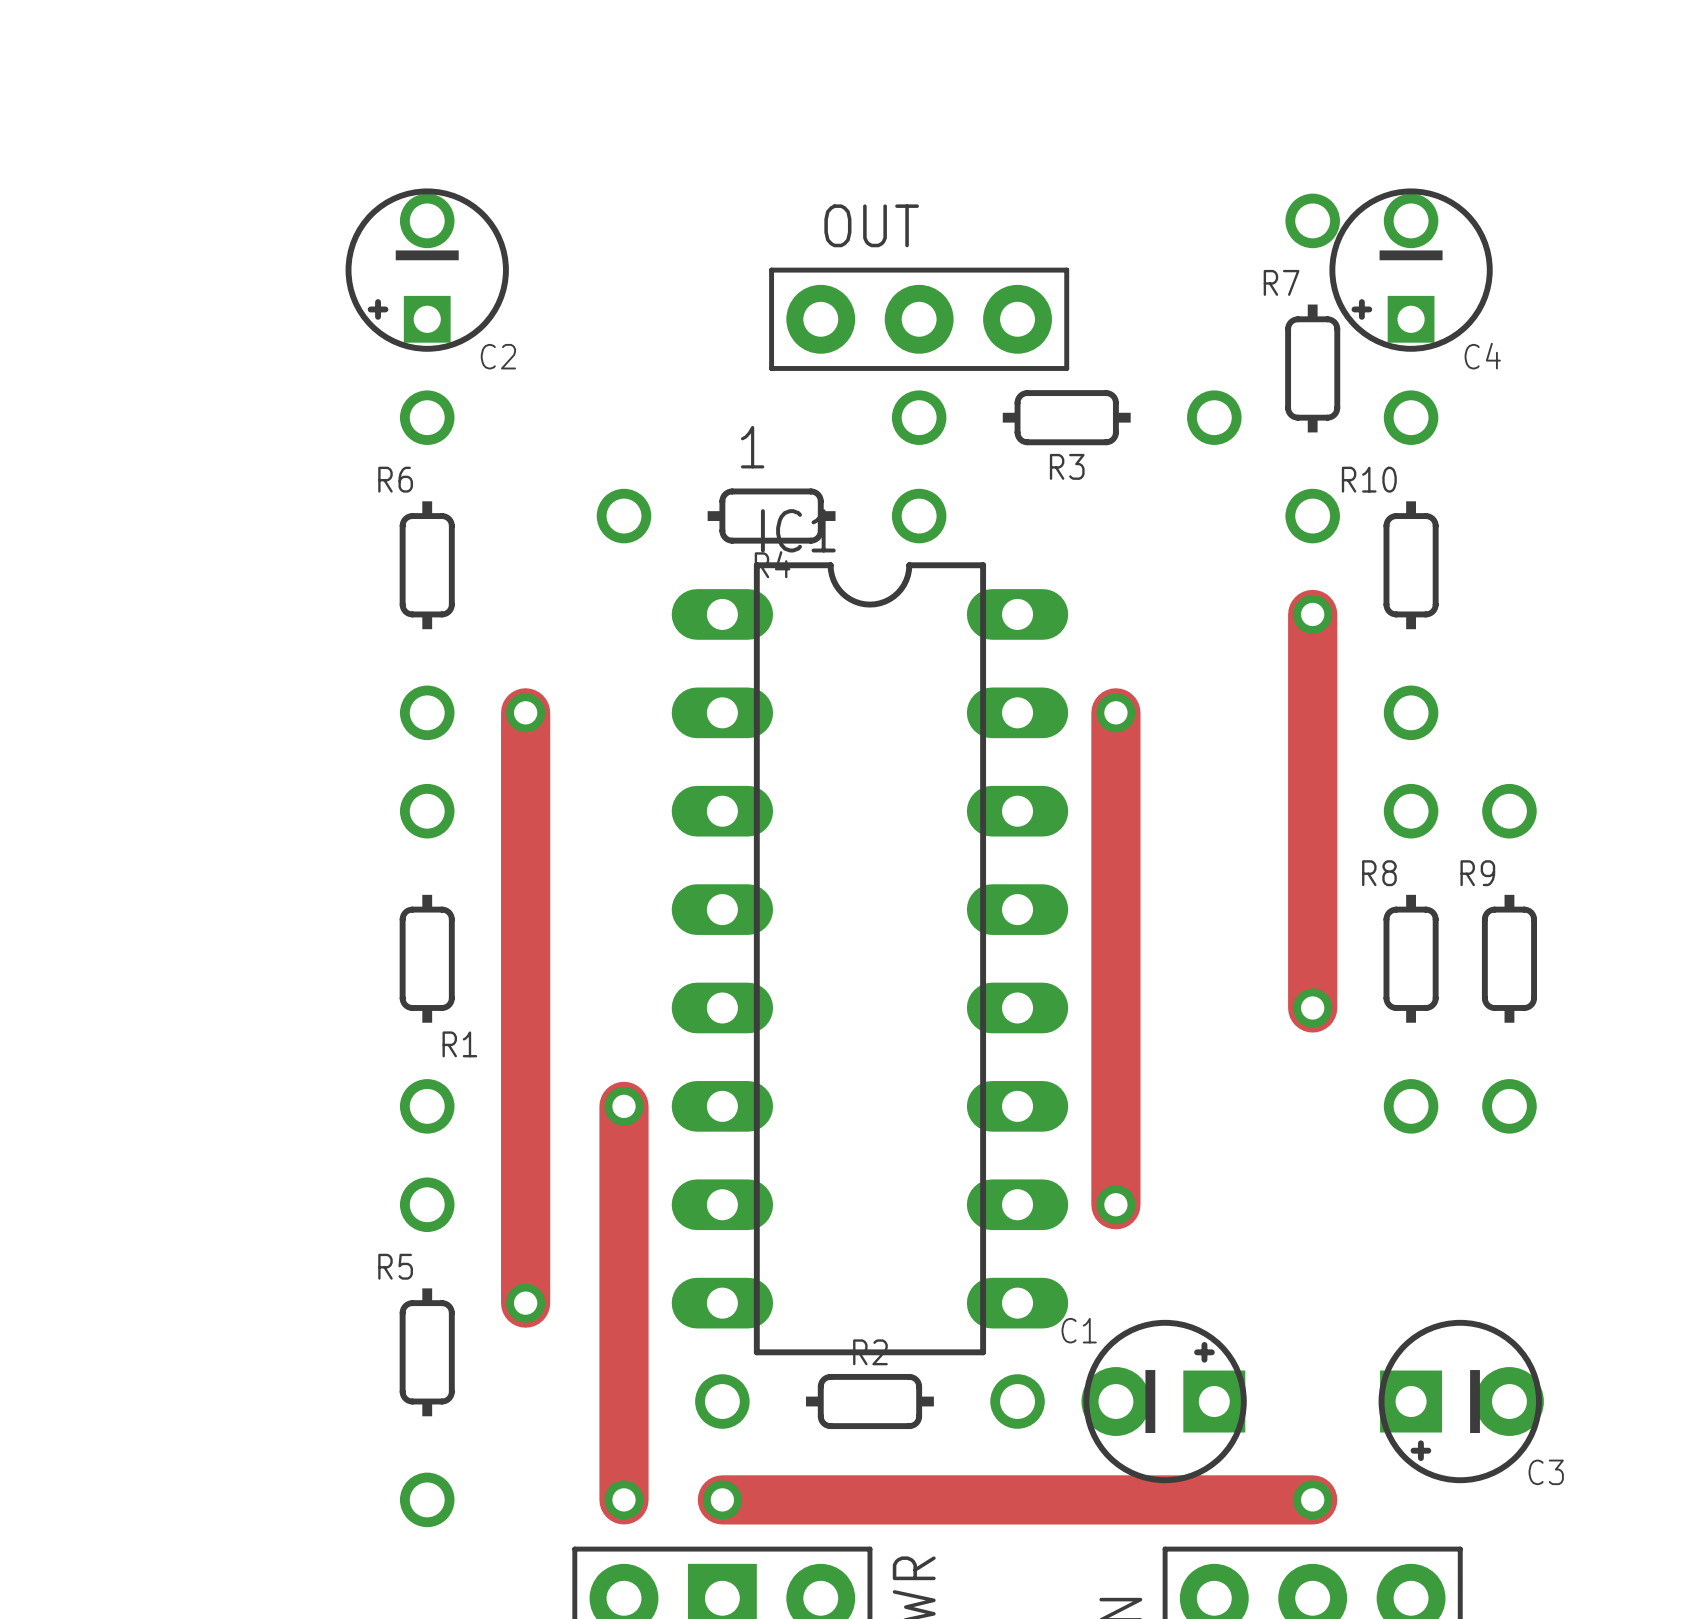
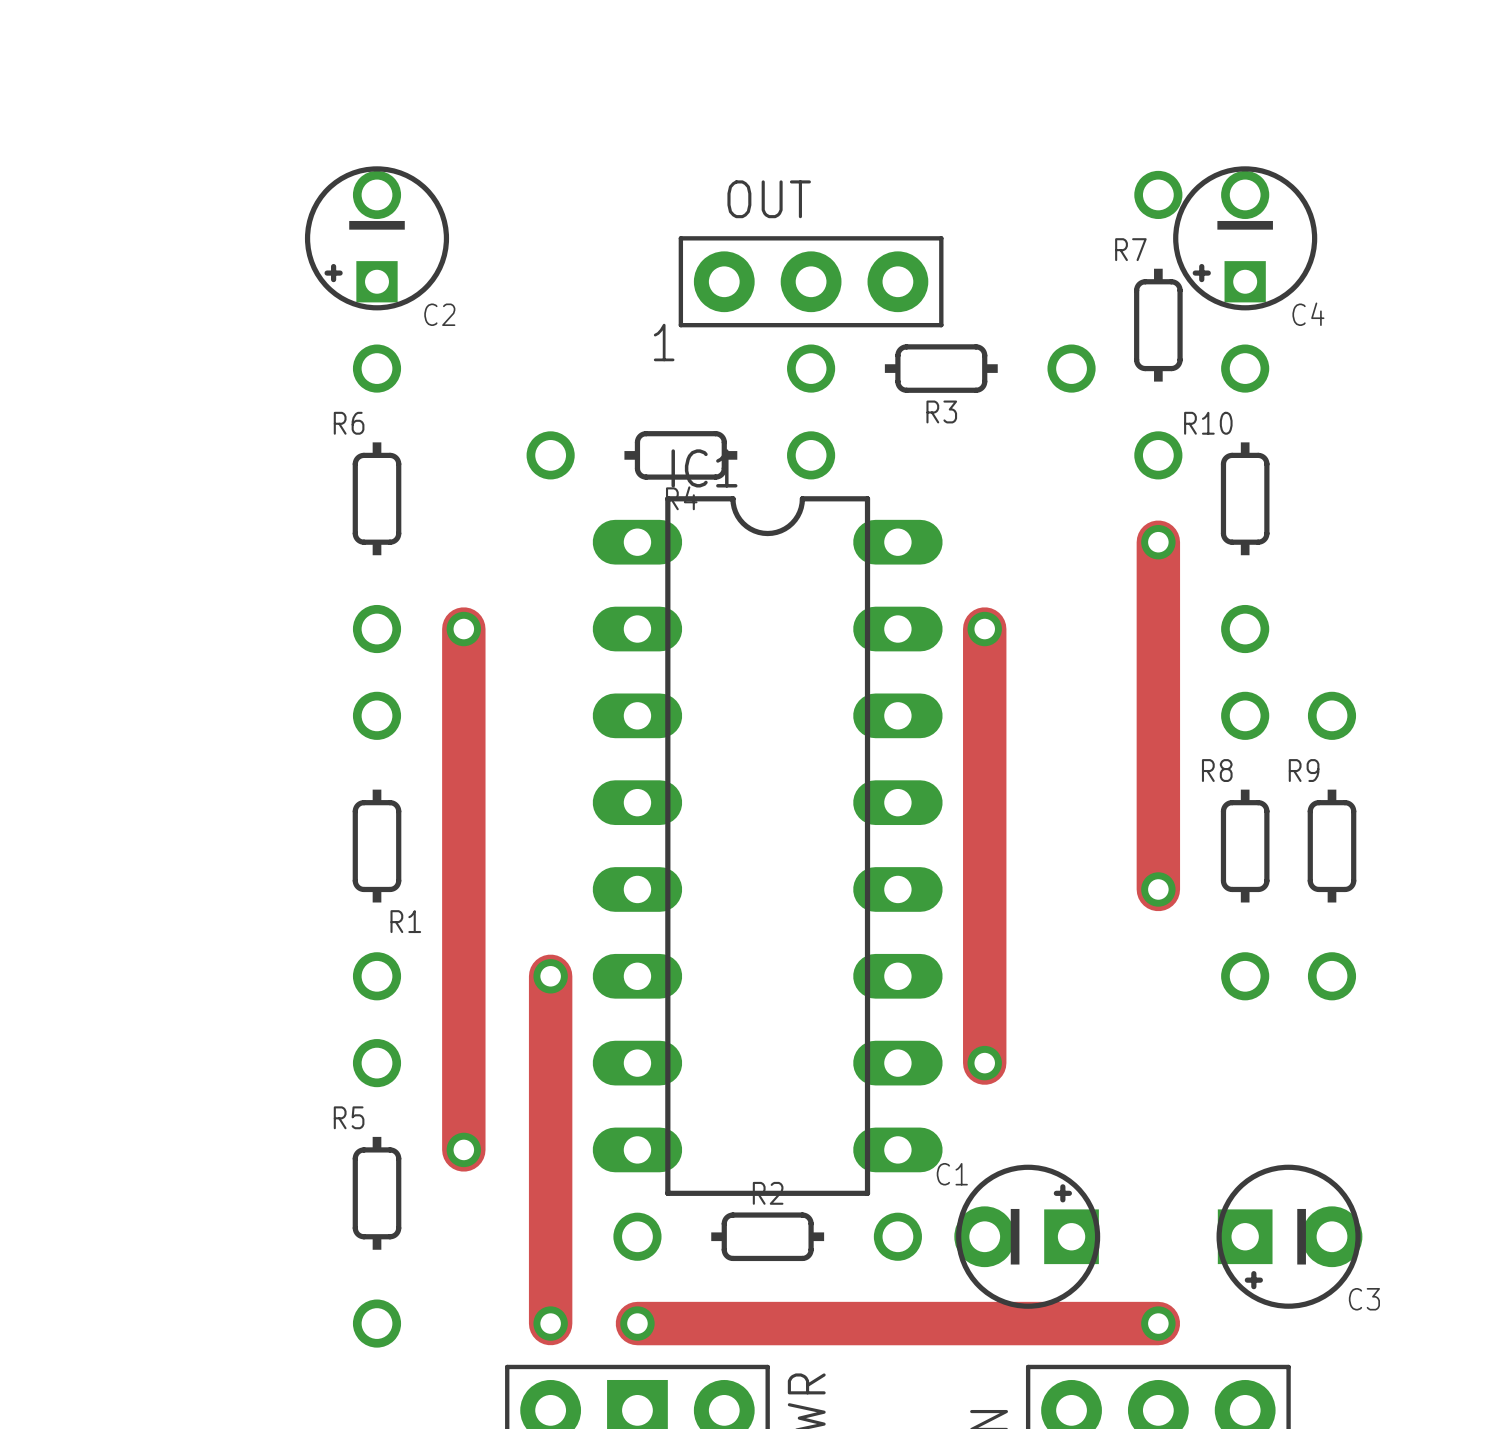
OUT text: none -> 1 (664, 342)
OUT text: 1 (752, 447) -> none

